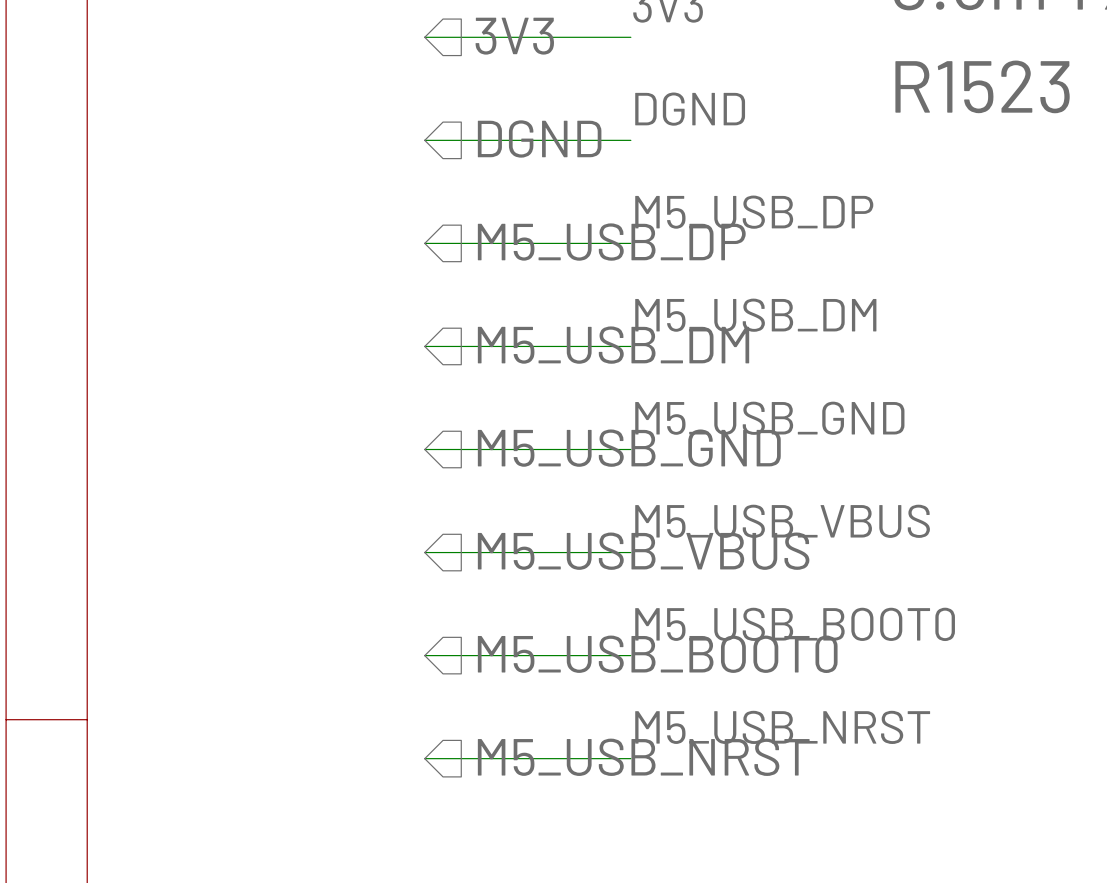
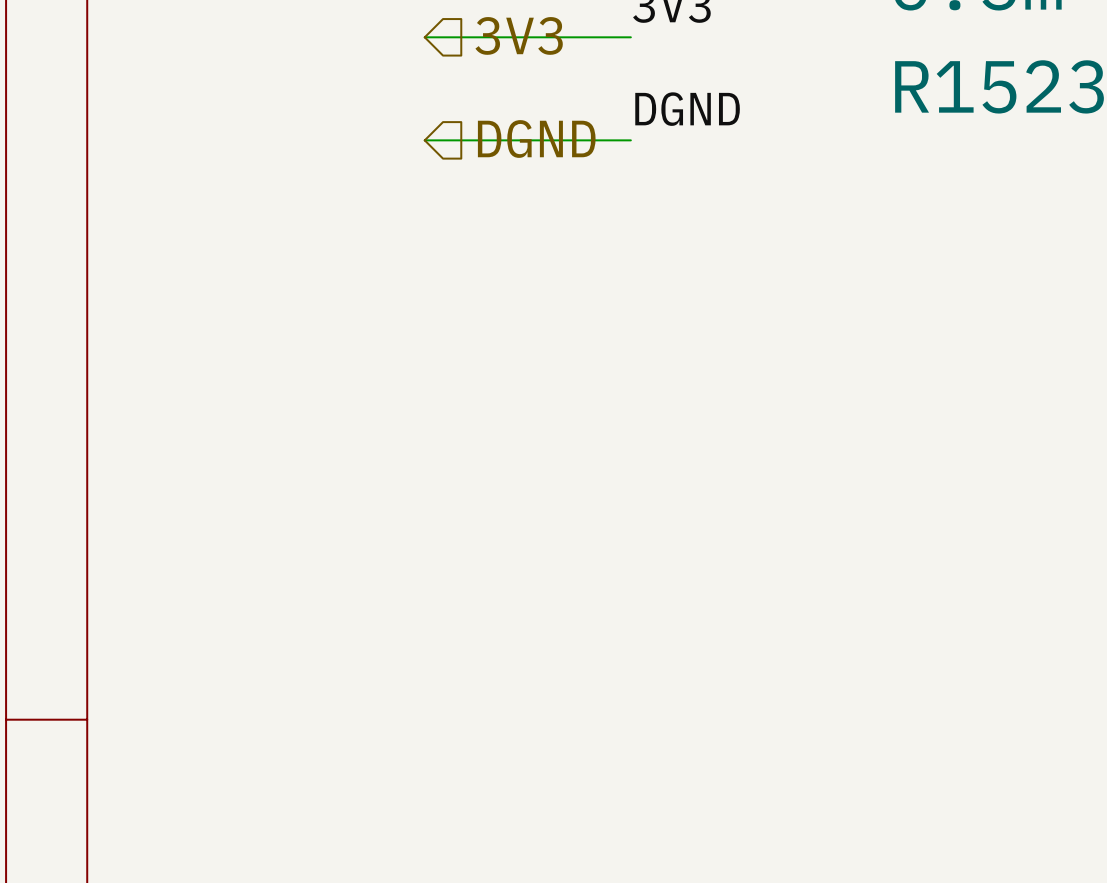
label: M5_USB_DP (754, 212) -> none
hierarchical label: M5_USB_DP (611, 242) -> none
wire: (424, 243) (630, 243) -> none
label: M5_USB_DM (755, 315) -> none
hierarchical label: M5_USB_DM (613, 345) -> none
wire: (424, 346) (630, 346) -> none
label: M5_USB_GND (769, 418) -> none
hierarchical label: M5_USB_GND (629, 448) -> none
wire: (424, 449) (630, 449) -> none
label: M5_USB_VBUS (782, 521) -> none
hierarchical label: M5_USB_VBUS (643, 551) -> none
wire: (424, 552) (630, 552) -> none
label: M5_USB_BOOT0 (795, 624) -> none
hierarchical label: M5_USB_BOOT0 (657, 654) -> none
wire: (424, 655) (630, 655) -> none
label: M5_USB_NRST (782, 727) -> none
hierarchical label: M5_USB_NRST (643, 757) -> none
wire: (424, 758) (630, 758) -> none

